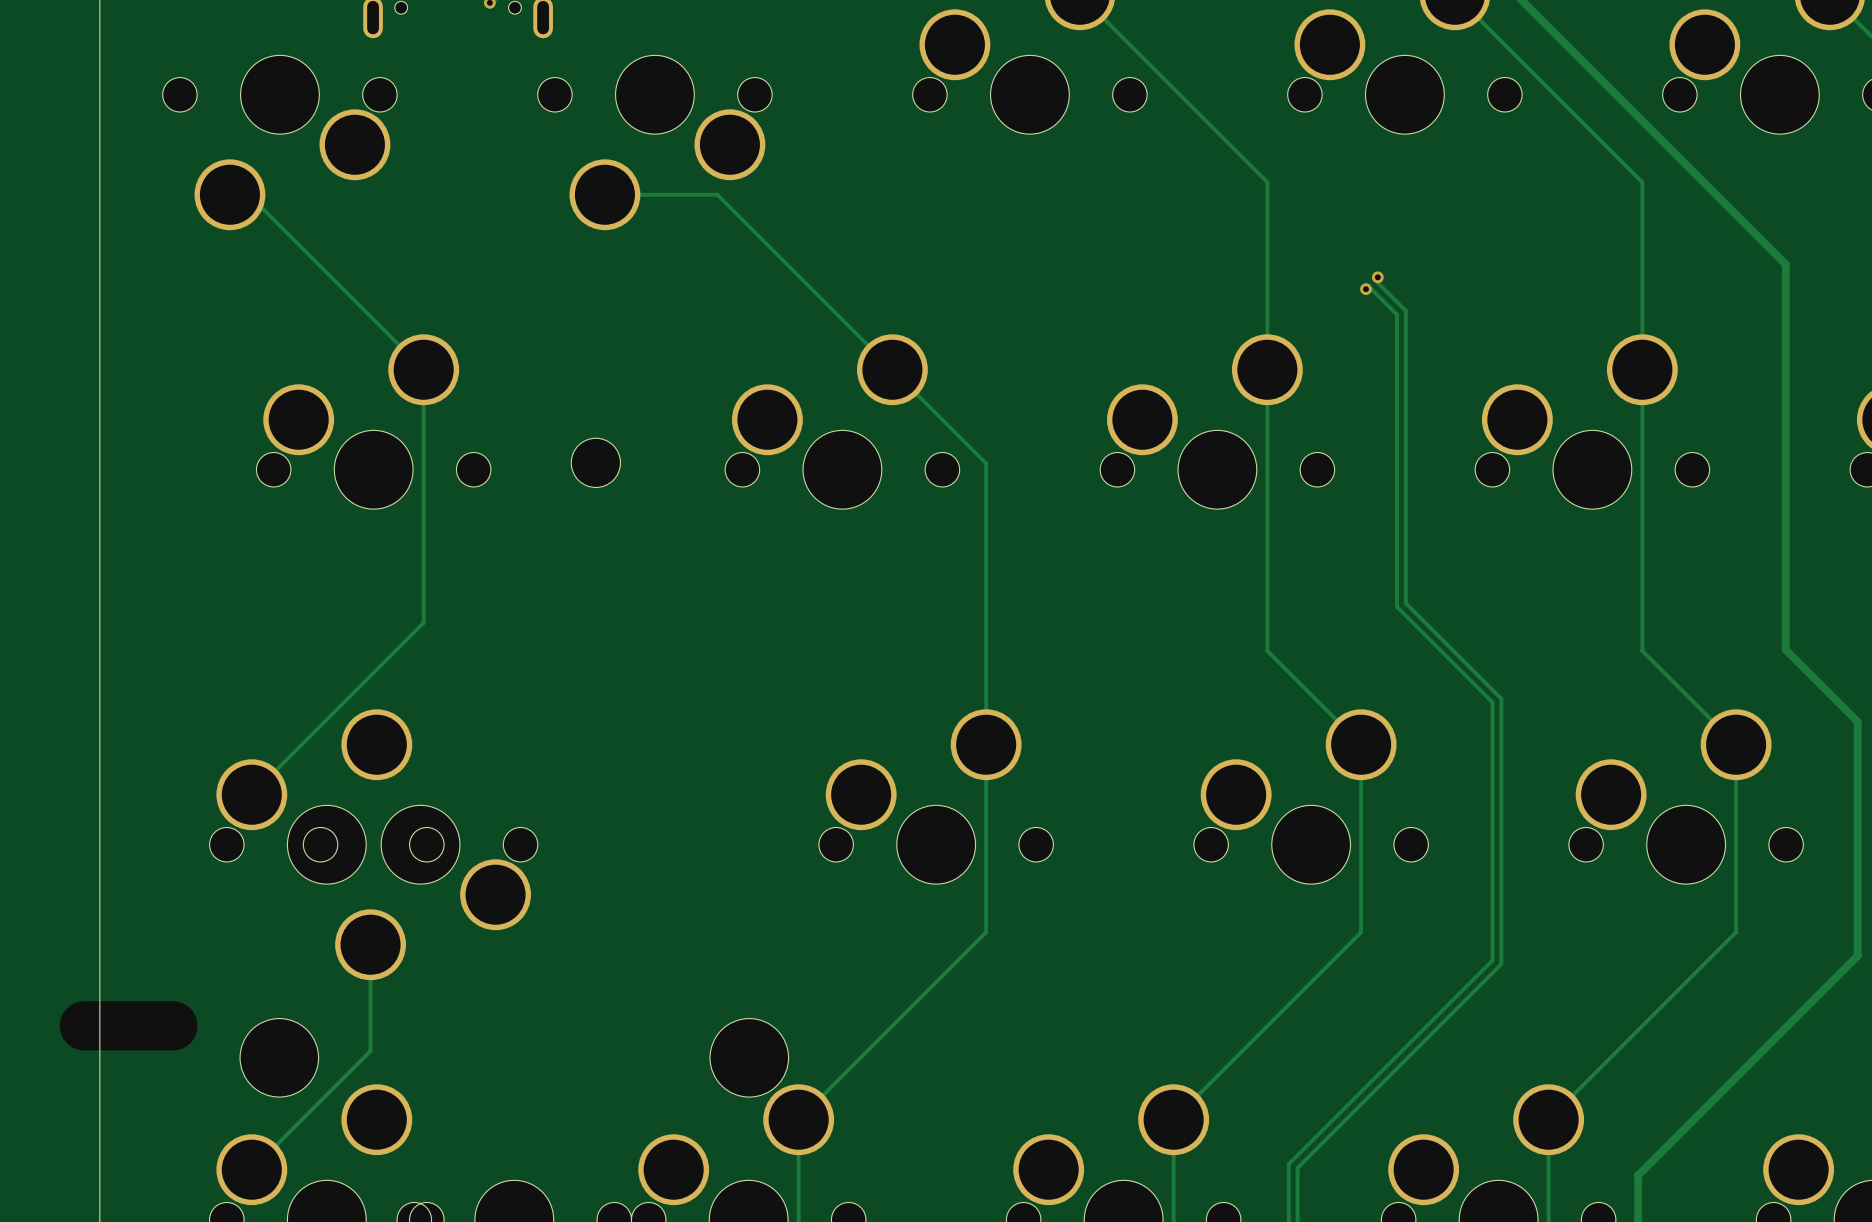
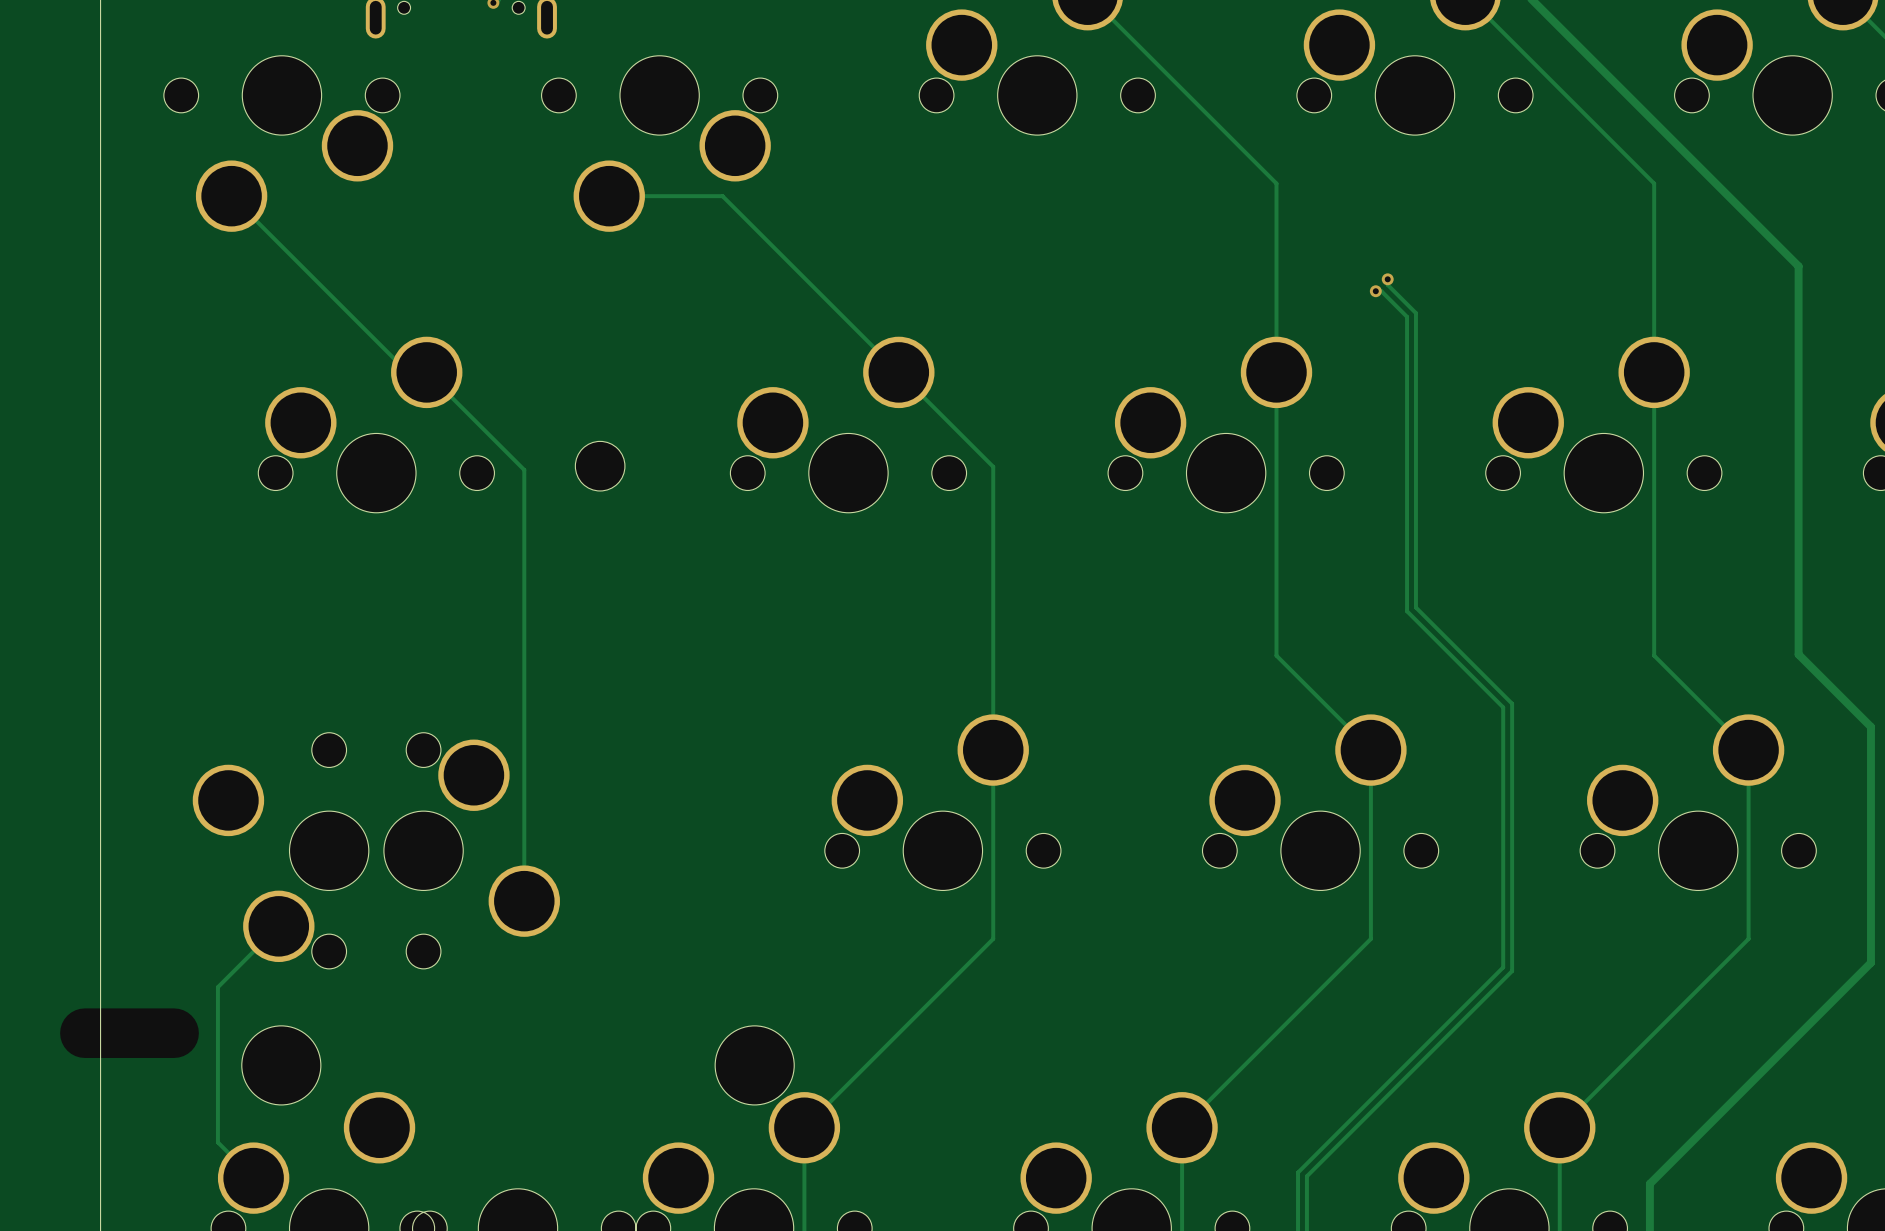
track: (229, 194) (248, 194) (423, 369) (423, 622) (251, 794) -> (231, 196) (407, 372) (426, 372) (524, 469) (524, 901)
part rotation: 0° (326, 796) -> 90° counterclockwise (280, 850)
part rotation: 0° (420, 892) -> 90° counterclockwise (471, 850)
track: (370, 944) (370, 1050) (251, 1169) -> (278, 926) (217, 987) (217, 1142) (253, 1178)

